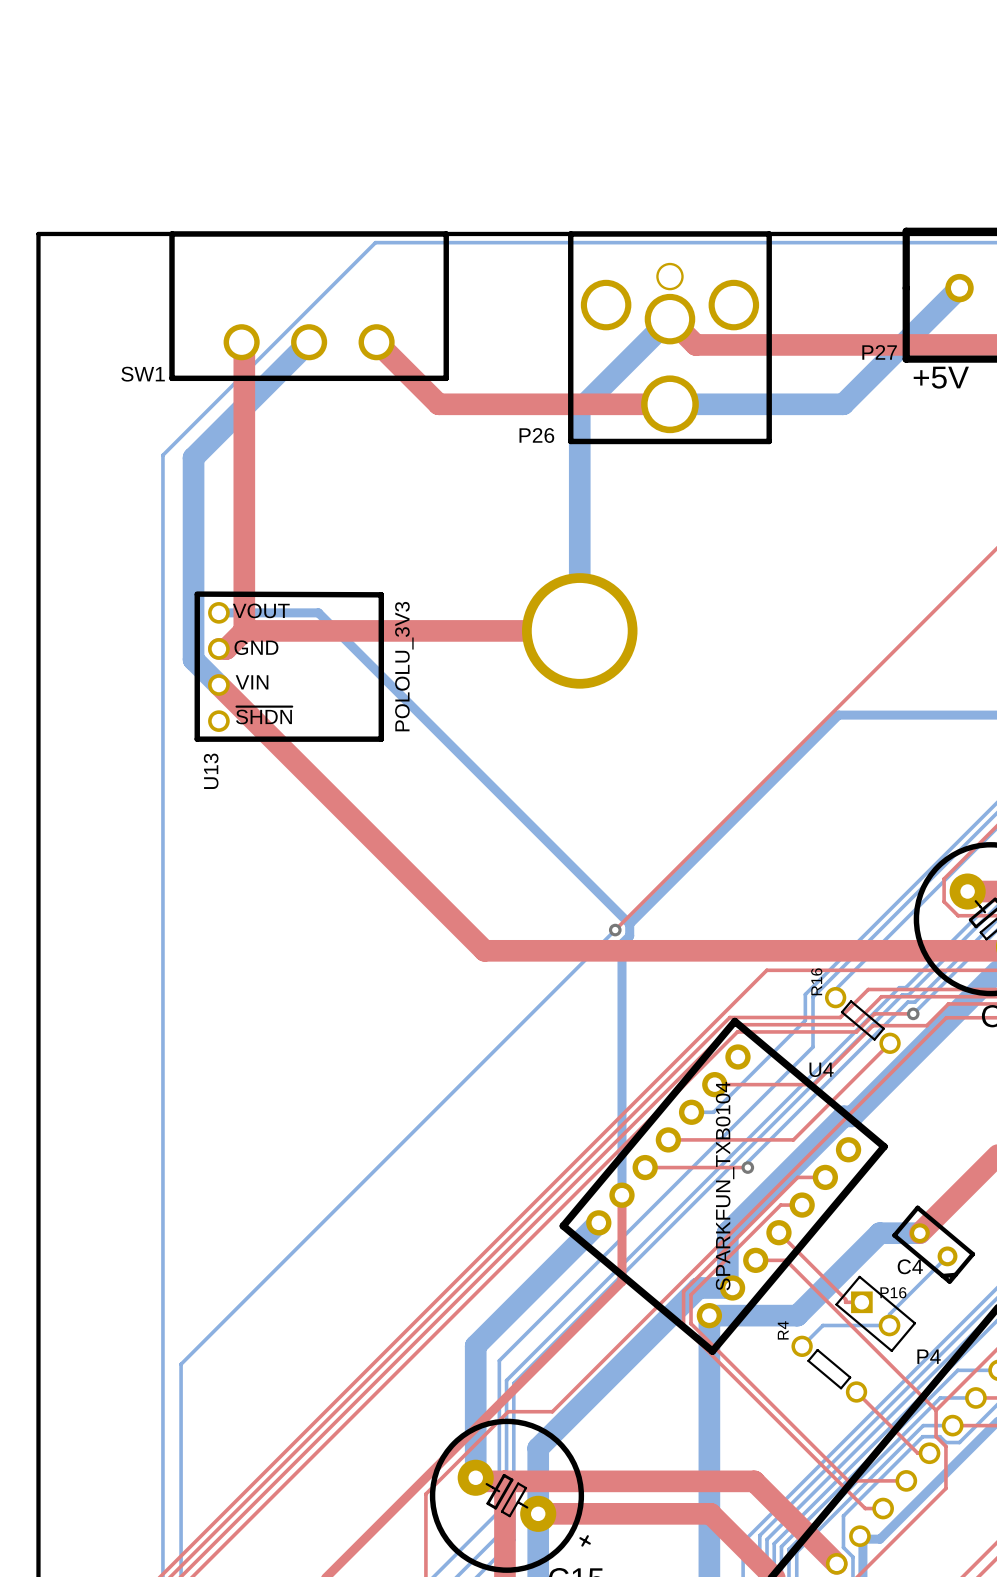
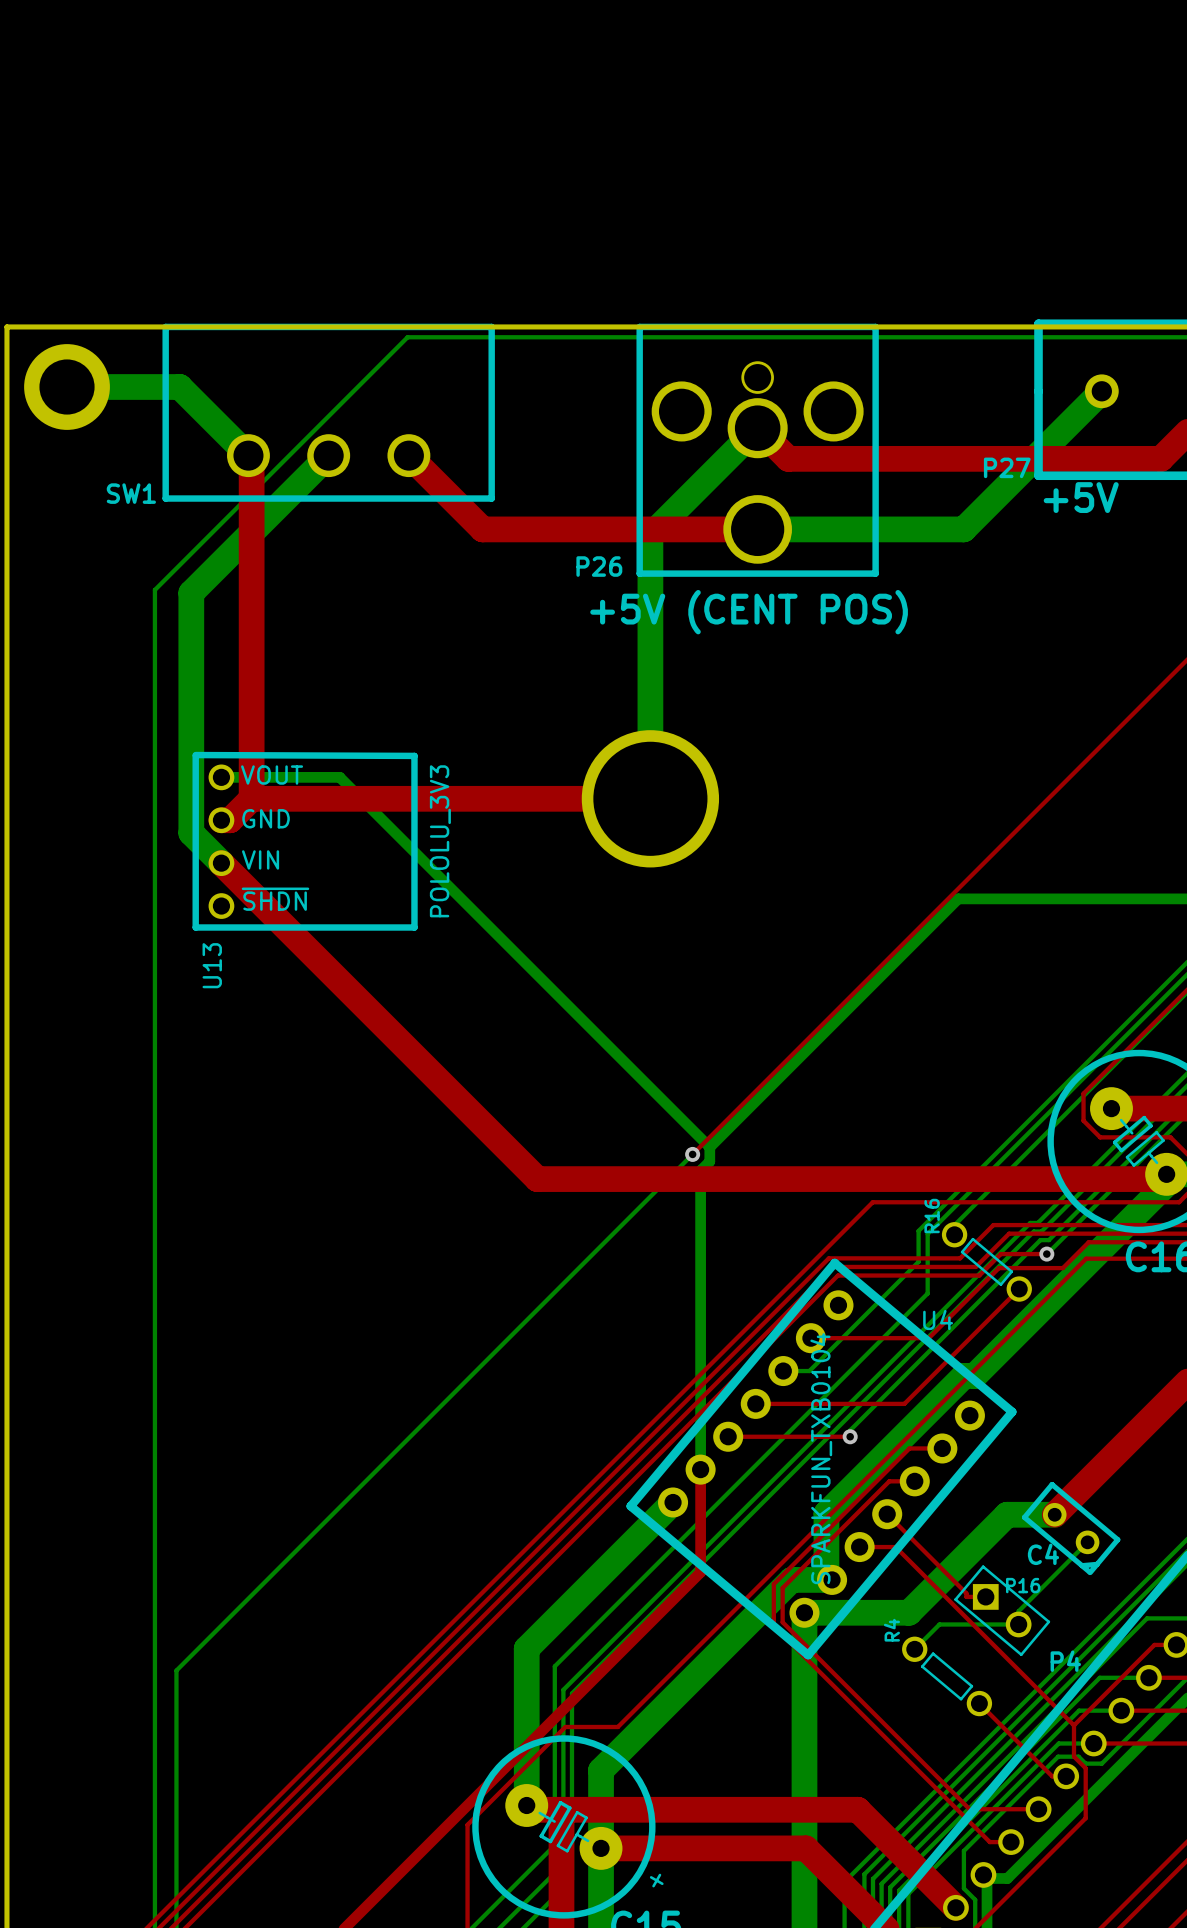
bottom track: none -> (67, 387) (179, 387) (248, 455)
part: none -> (67, 387)
text: none -> +5V (CENT POS) (749, 612)

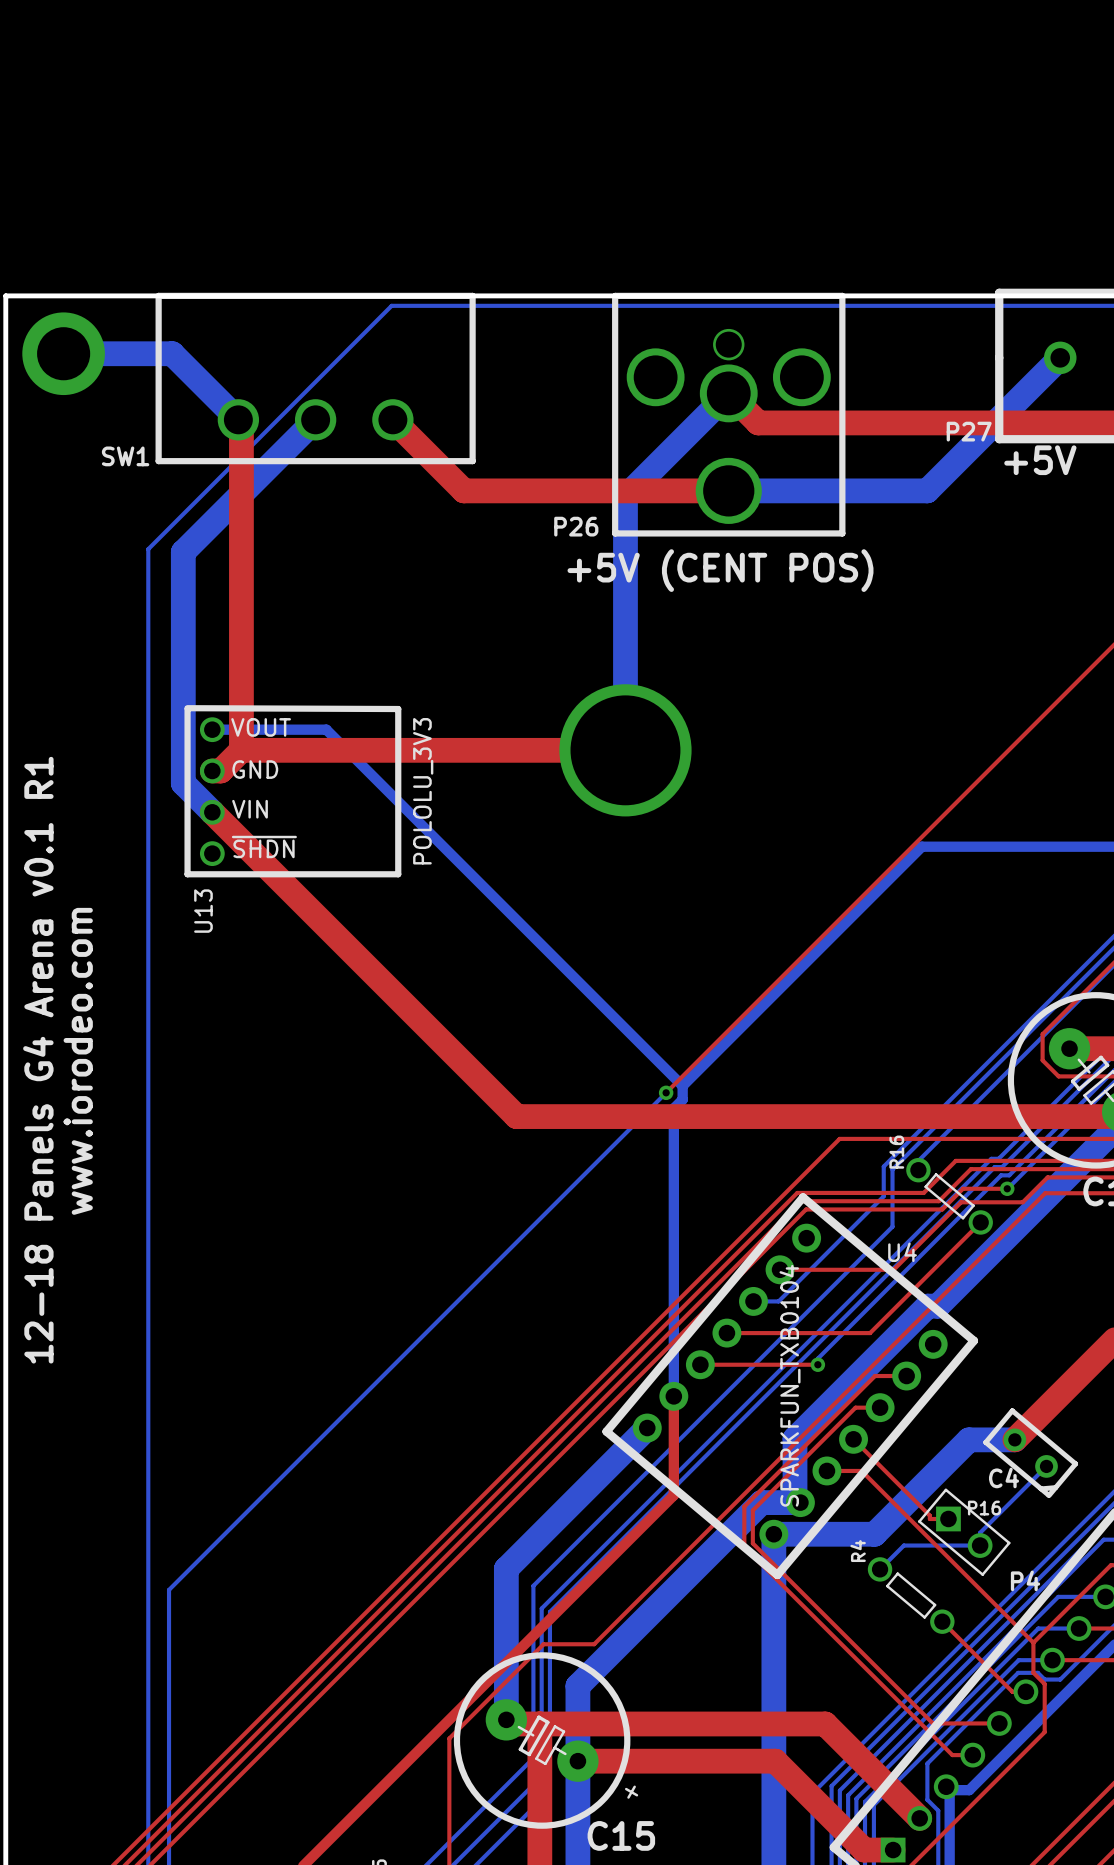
text: none -> 12-18 Panels G4 Arena v0.1 R1 (38, 1060)
text: none -> www.iorodeo.com (78, 1061)

